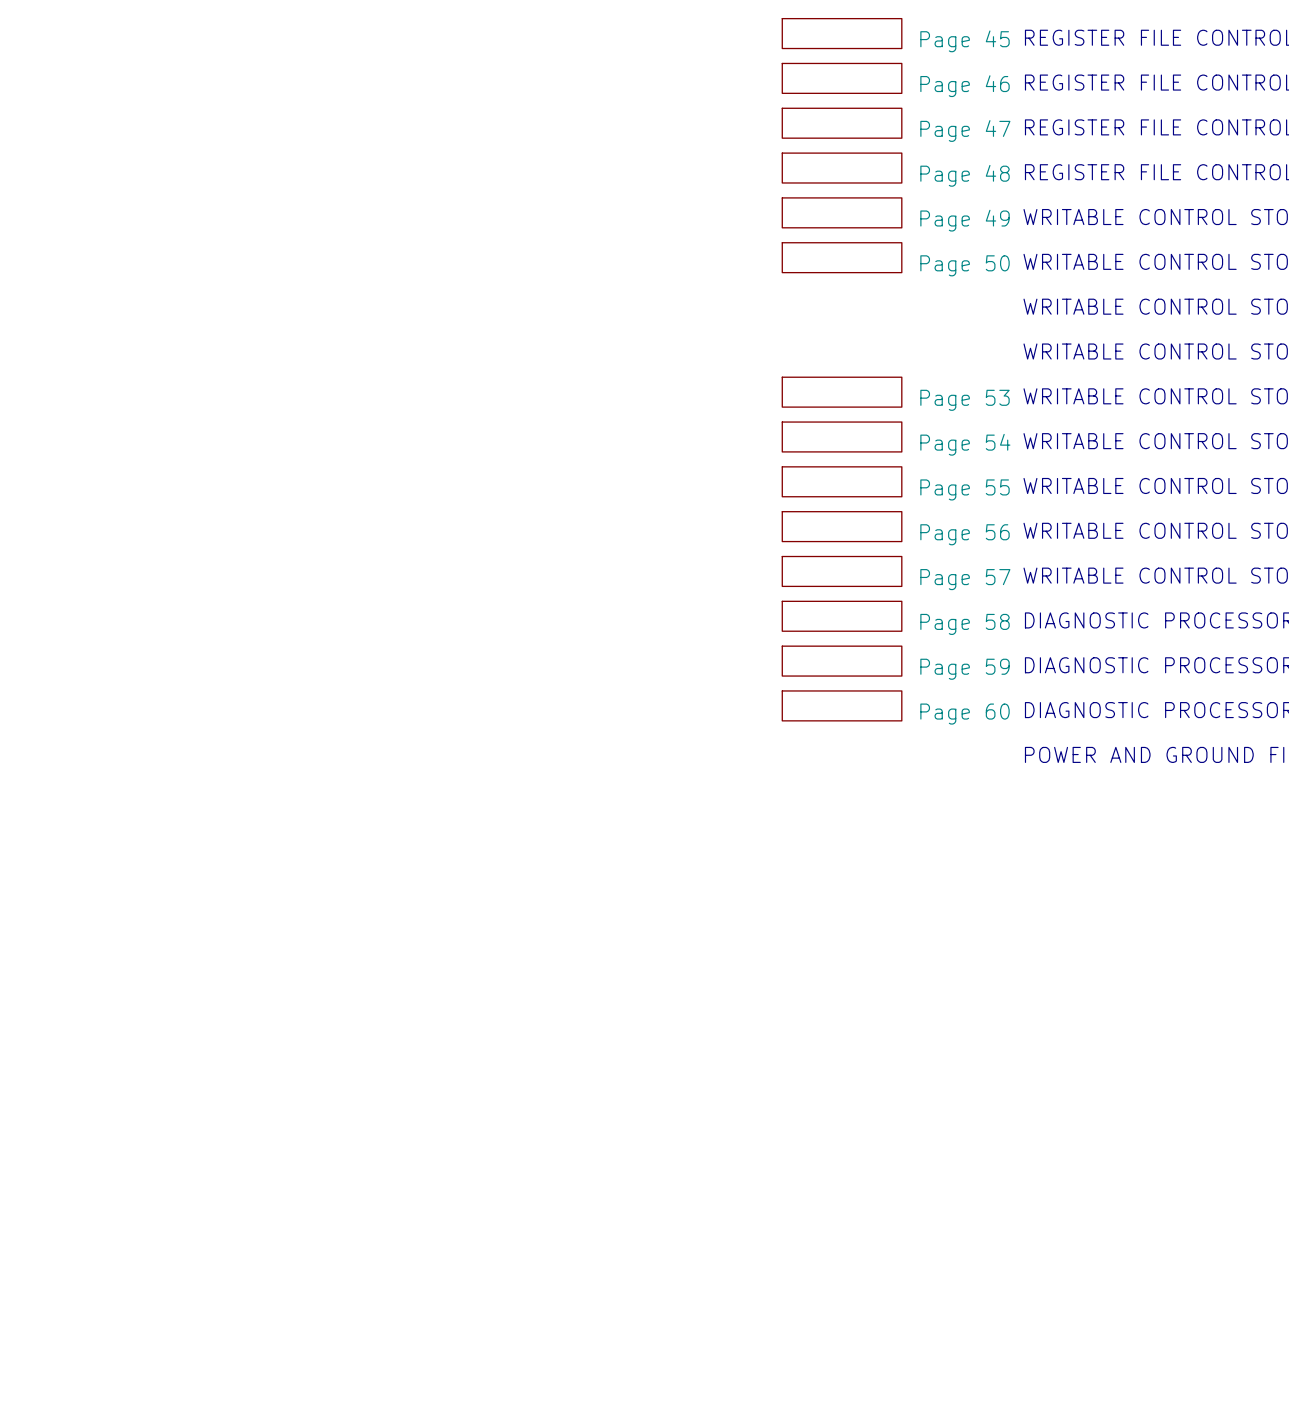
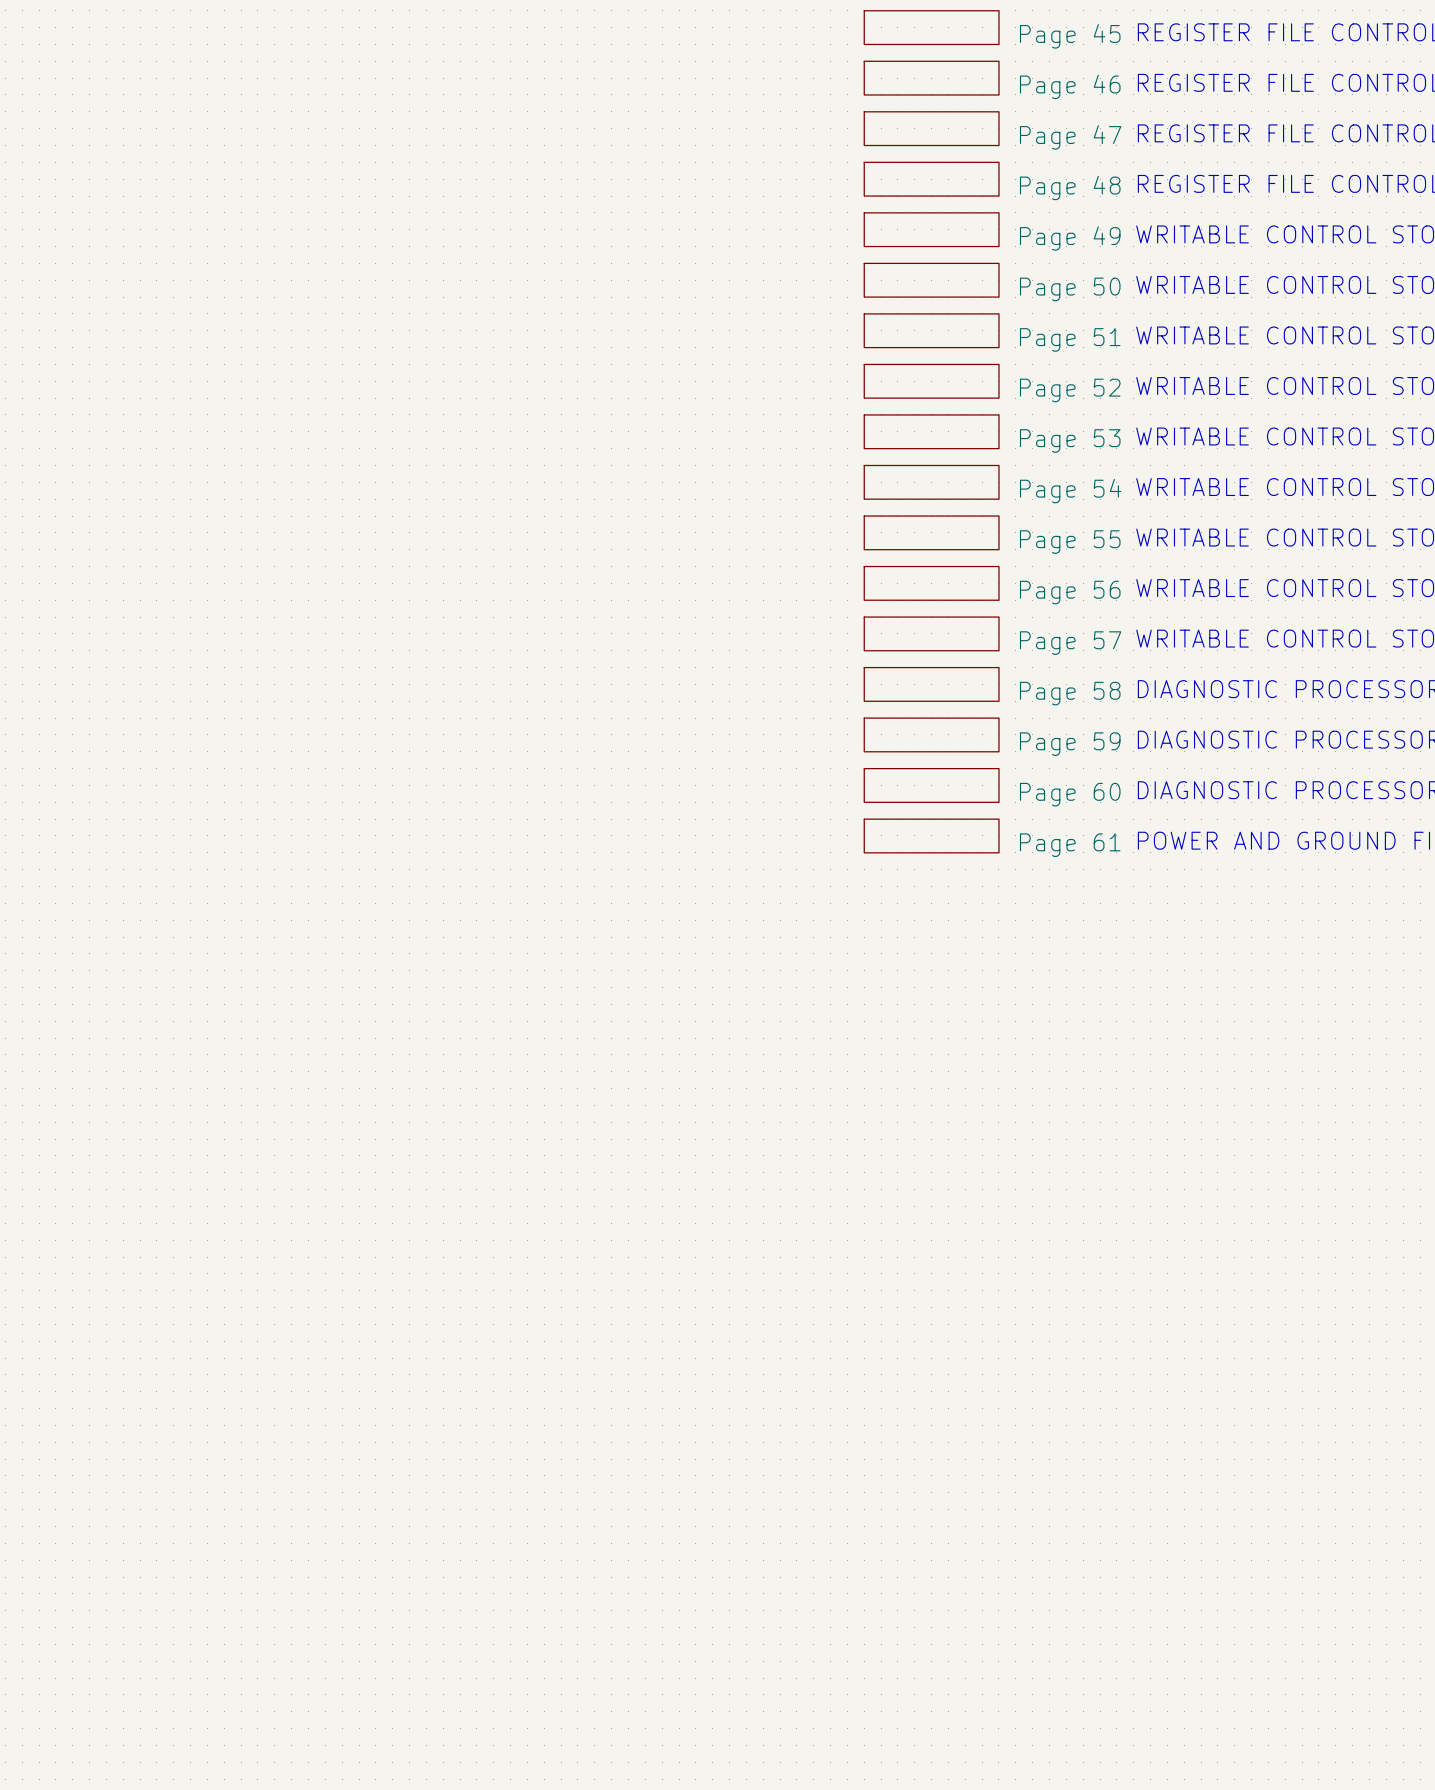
sheet Page 51: none -> (931, 330)
sheet Page 52: none -> (931, 381)
sheet Page 61: none -> (931, 835)

